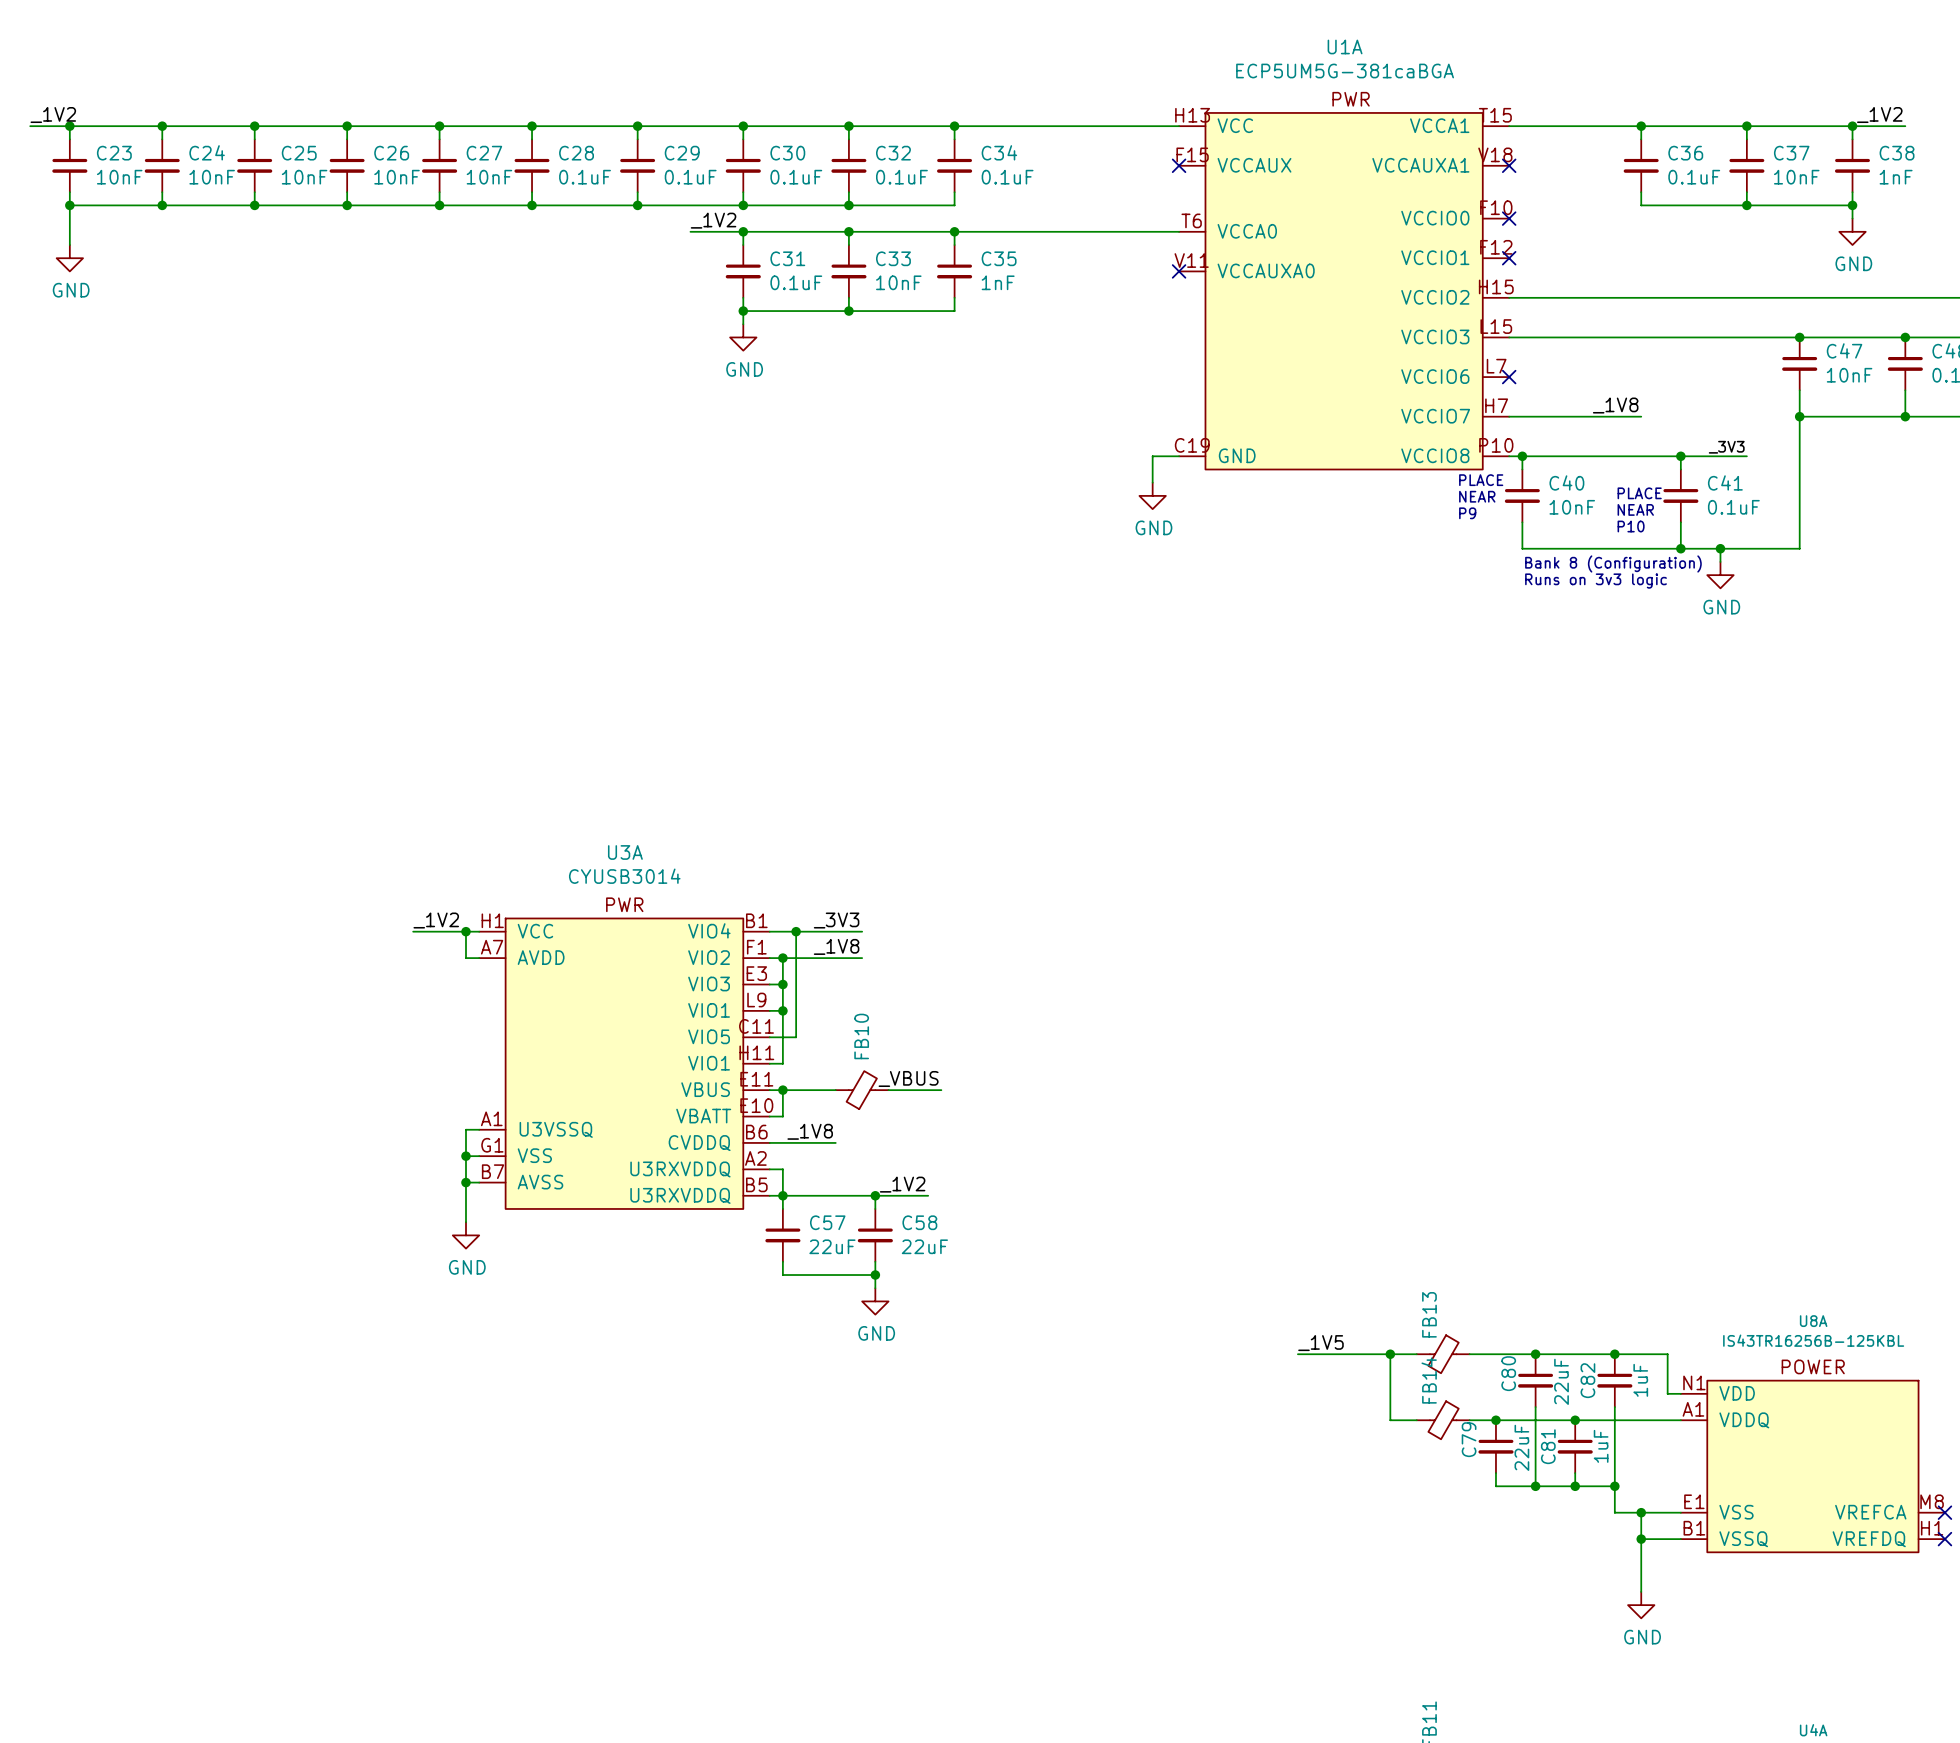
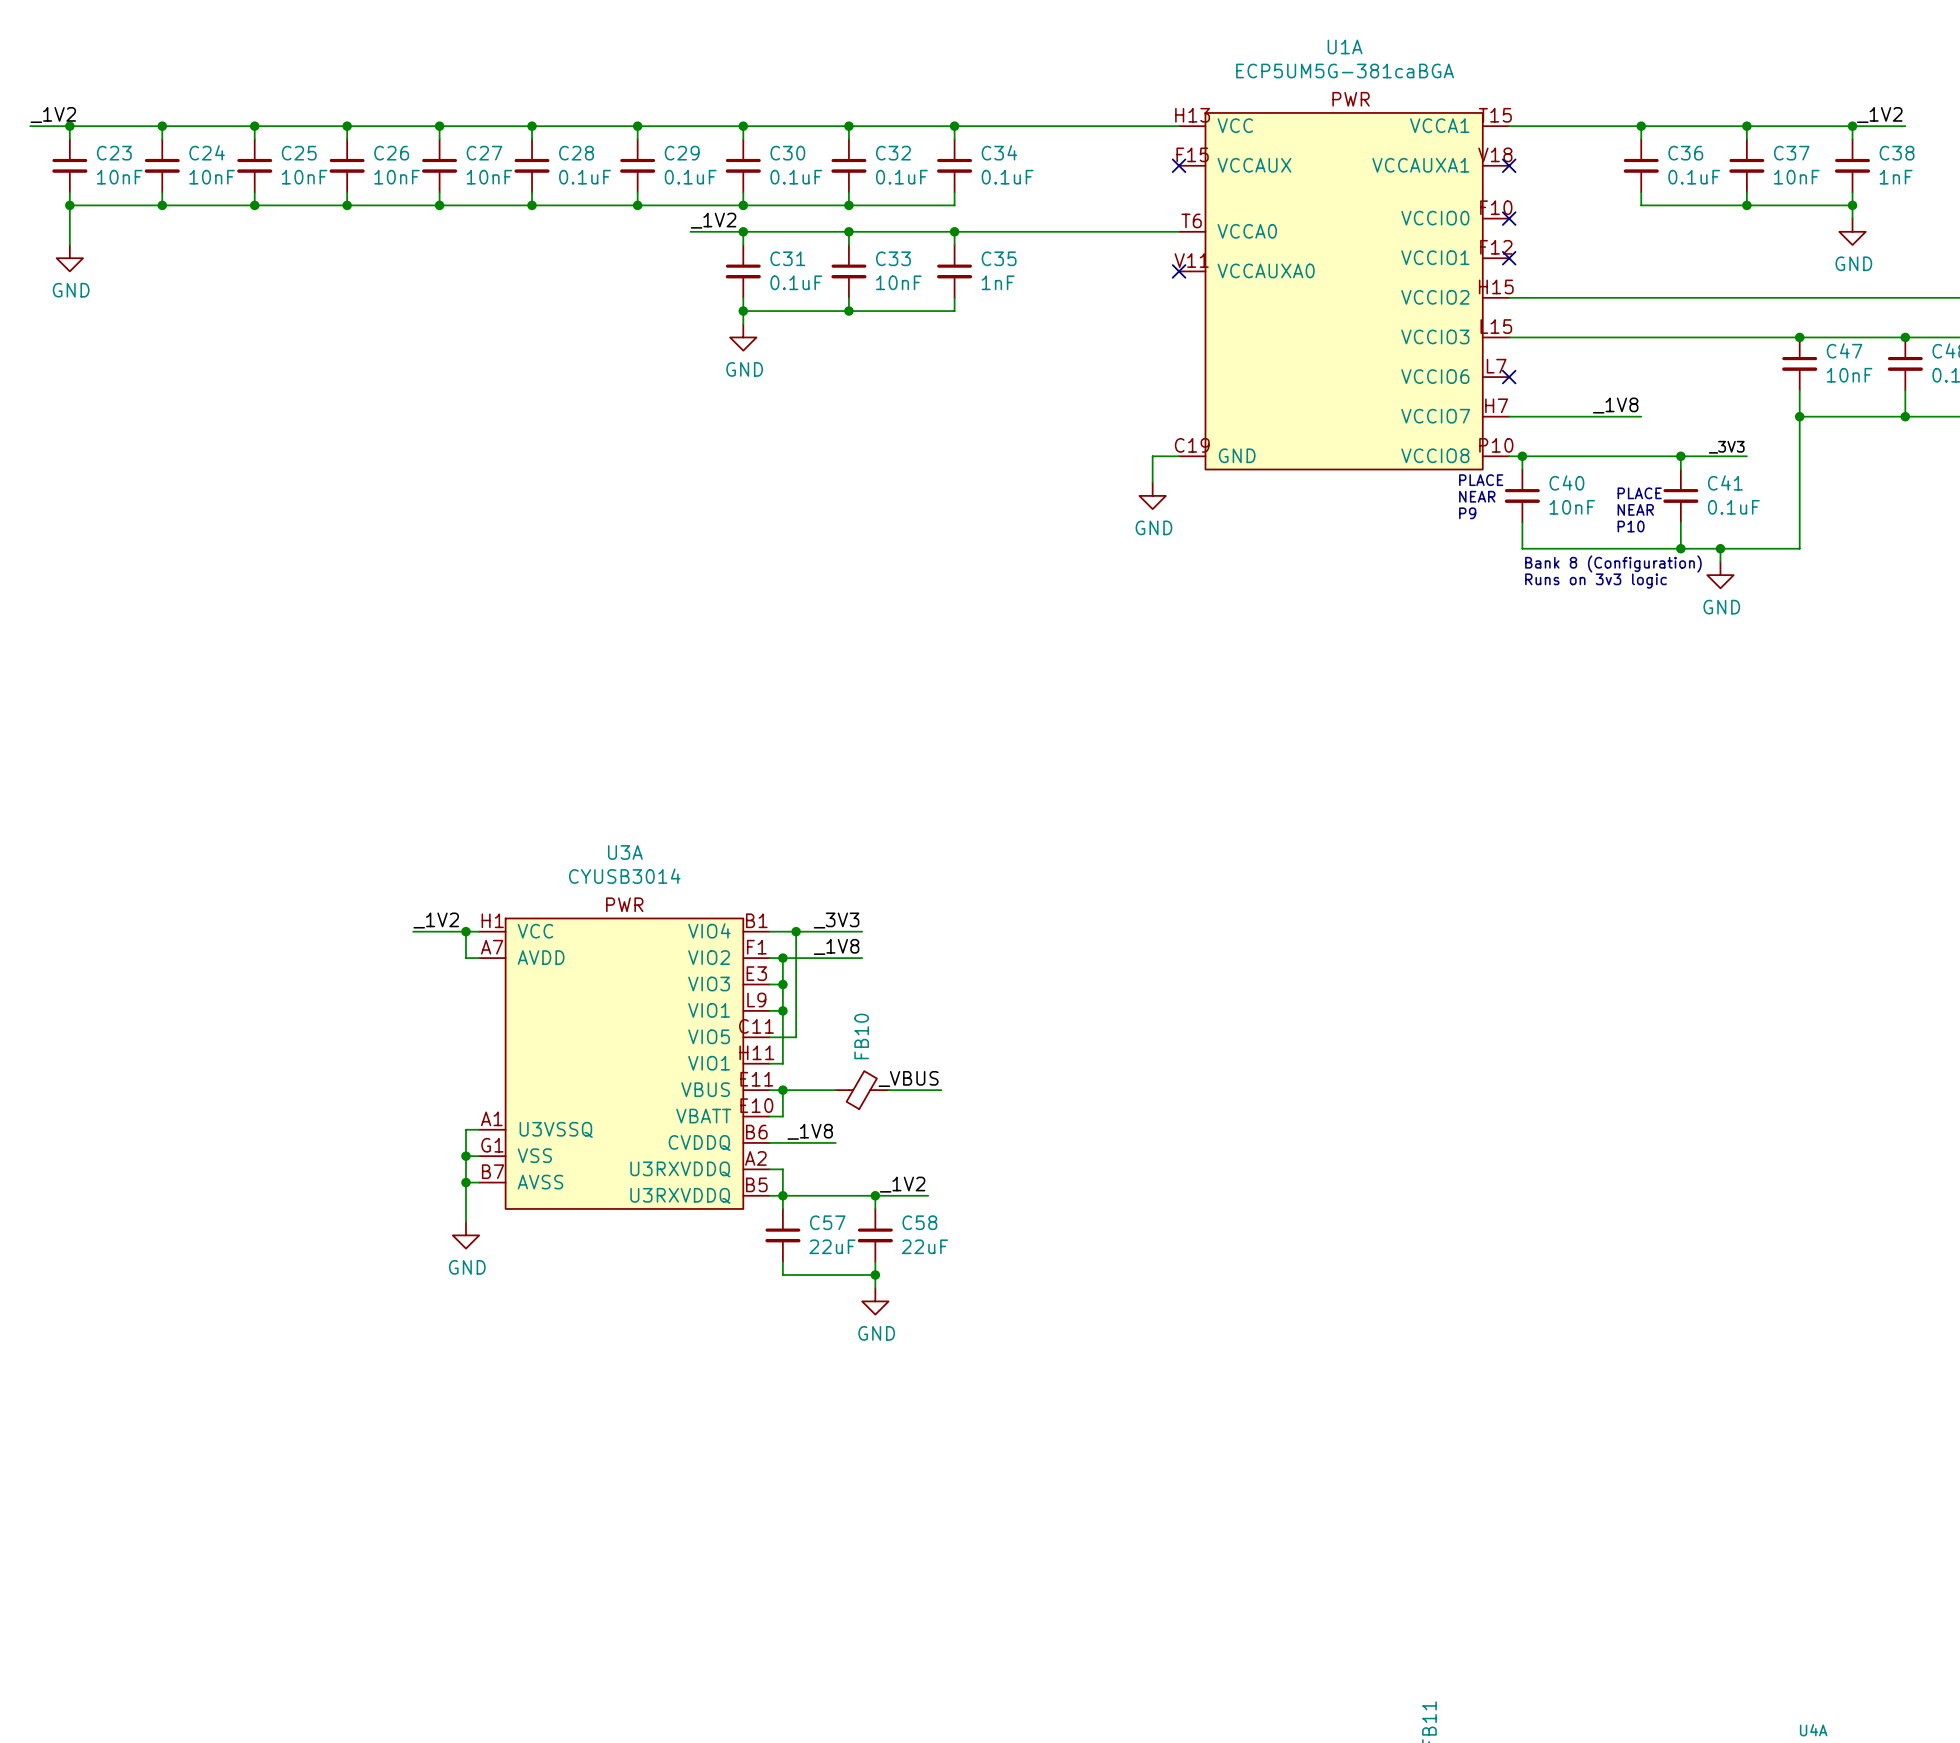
label: _1V5 (1320, 1343) -> none
wire: (1297, 1354) (1416, 1354) -> none
wire: (1390, 1354) (1390, 1420) (1416, 1420) -> none
junction: (1390, 1354) -> none
FB13: (1443, 1354) -> none
wire: (1469, 1354) (1667, 1354) (1667, 1393) (1680, 1393) -> none
junction: (1535, 1354) -> none
junction: (1614, 1354) -> none
C80: 22uF (1535, 1380) -> none
C82: 1uF (1614, 1380) -> none
wire: (1535, 1407) (1535, 1486) -> none
wire: (1614, 1407) (1614, 1512) (1680, 1512) -> none
FB14: (1443, 1420) -> none
wire: (1469, 1420) (1680, 1420) -> none
junction: (1495, 1420) -> none
junction: (1575, 1420) -> none
C79: 22uF (1495, 1446) -> none
C81: 1uF (1575, 1446) -> none
U8A: IS43TR16256B-125KBL (1812, 1466) -> none
wire: (1495, 1473) (1495, 1486) (1614, 1486) -> none
wire: (1575, 1473) (1575, 1486) -> none
junction: (1535, 1486) -> none
junction: (1575, 1486) -> none
junction: (1614, 1486) -> none
wire: (1641, 1512) (1641, 1591) -> none
junction: (1641, 1512) -> none
no-connect mark: (1944, 1512) -> none
wire: (1641, 1539) (1680, 1539) -> none
junction: (1641, 1539) -> none
no-connect mark: (1944, 1539) -> none
power symbol: GND (1641, 1605) -> none

